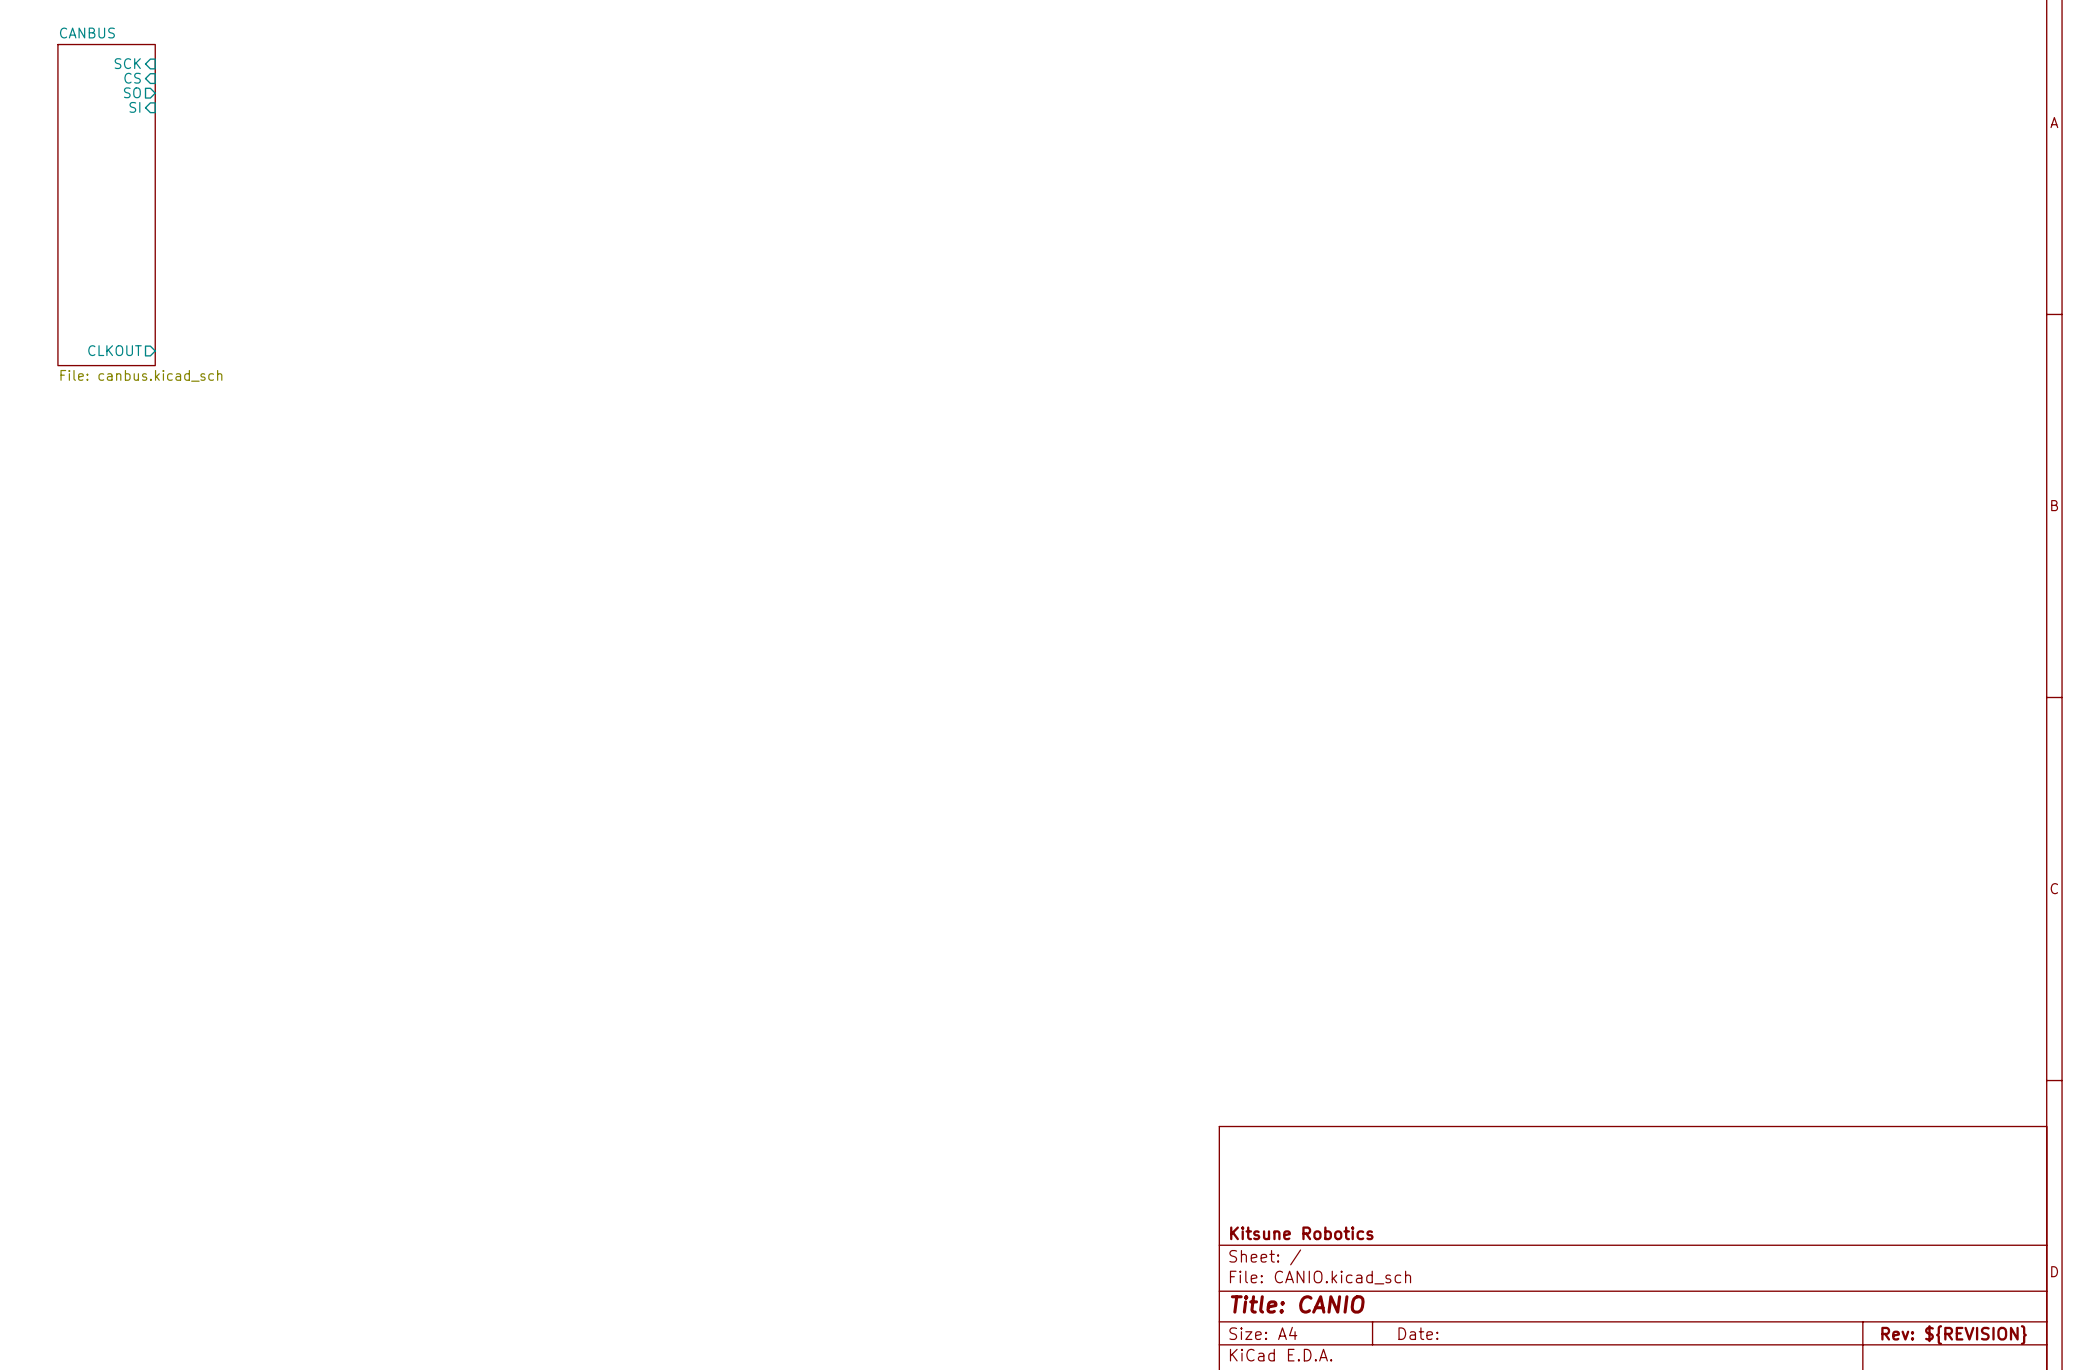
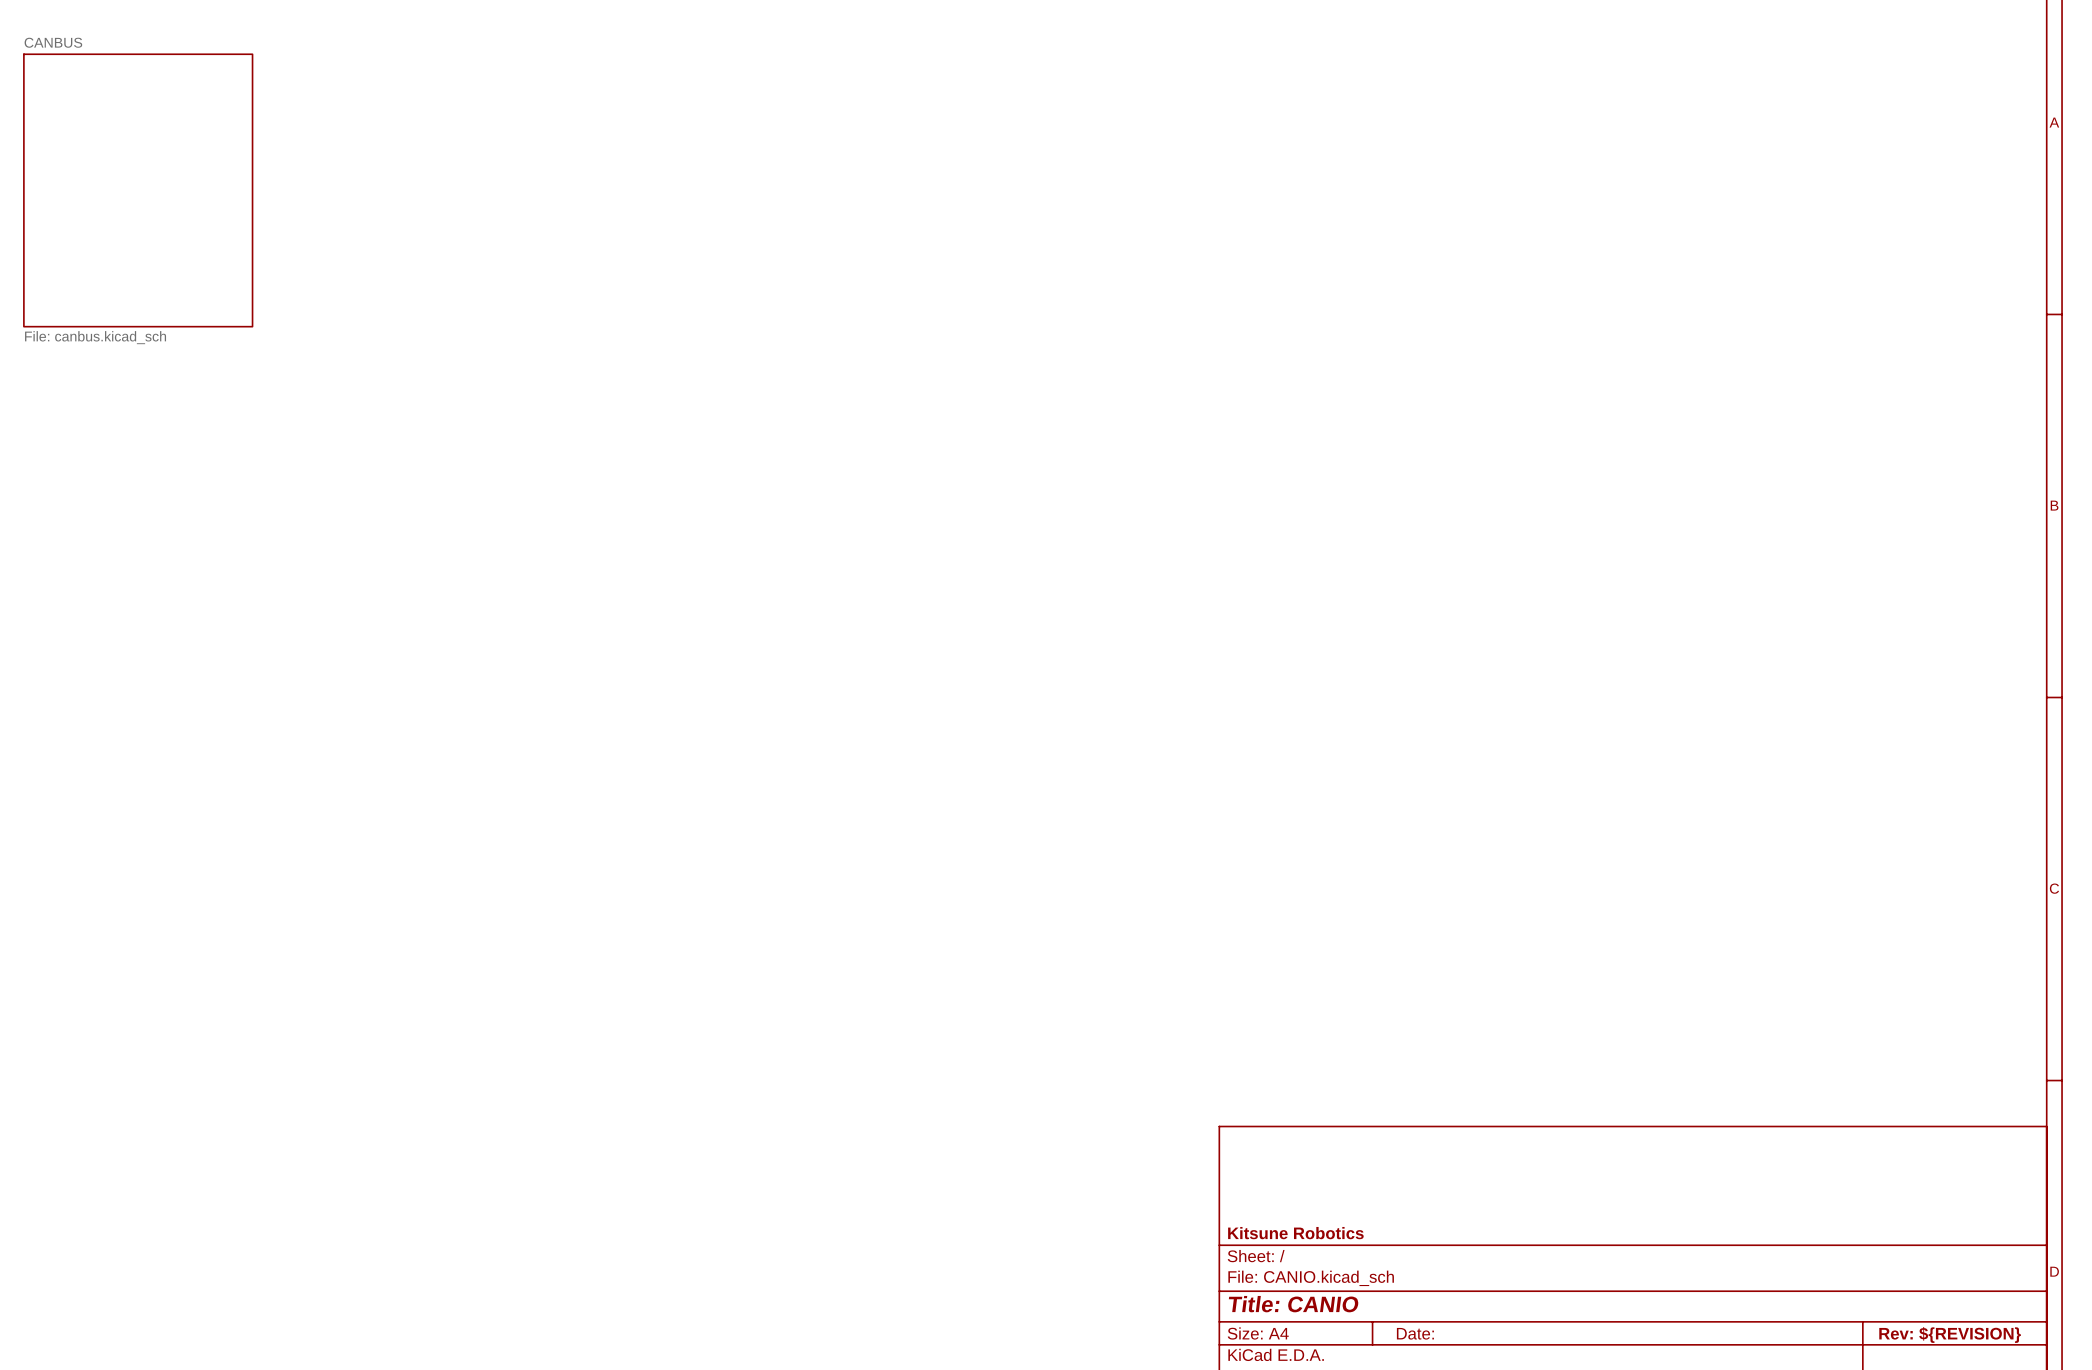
sheet pin: SCK (127, 63) -> none
sheet pin: CS (132, 78) -> none
sheet pin: SO (132, 92) -> none
sheet pin: SI (134, 107) -> none
sheet CANBUS: none -> File: canbus.kicad_sch (138, 190)
sheet CANBUS: File: canbus.kicad_sch (106, 205) -> none
sheet pin: CLKOUT (115, 350) -> none

